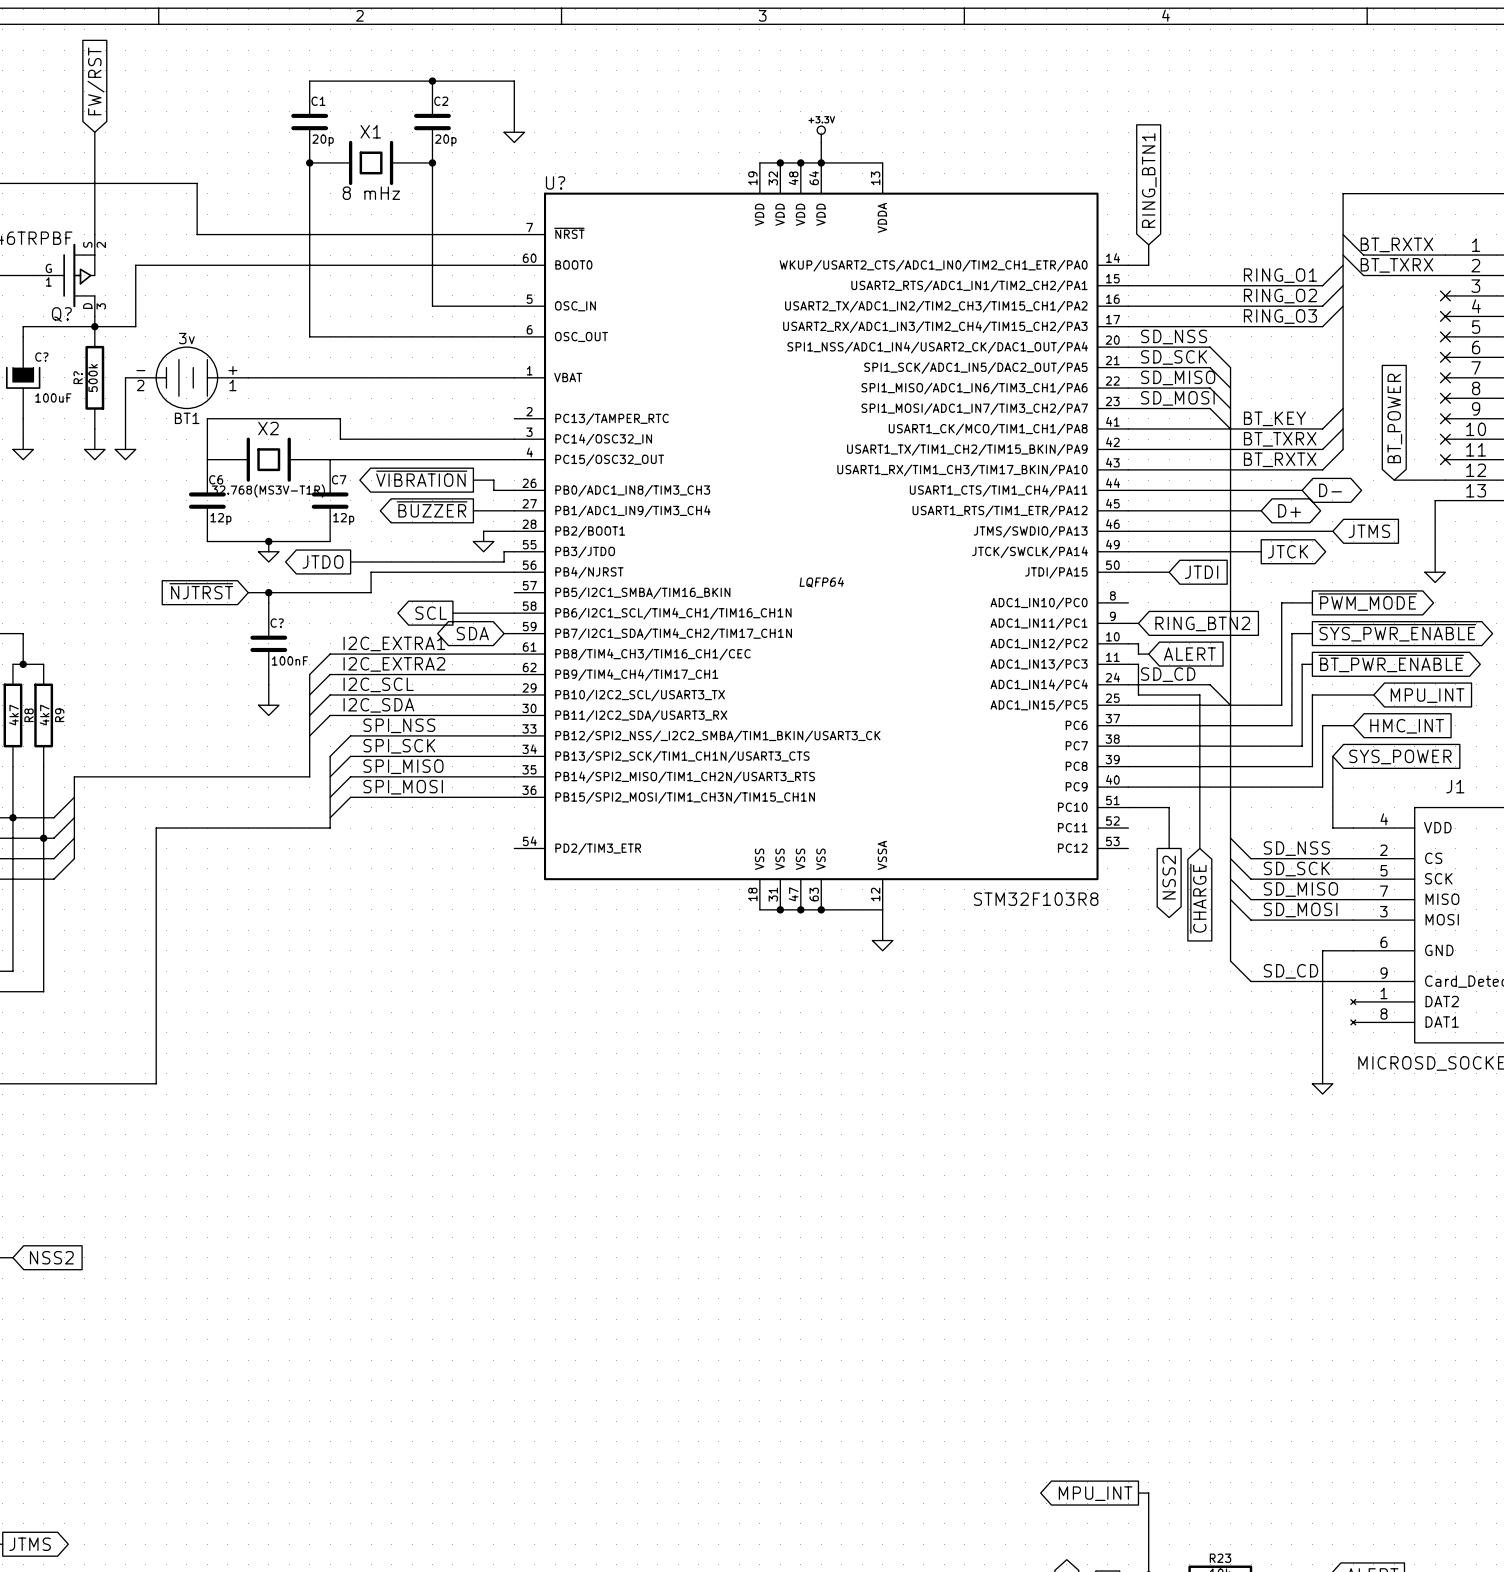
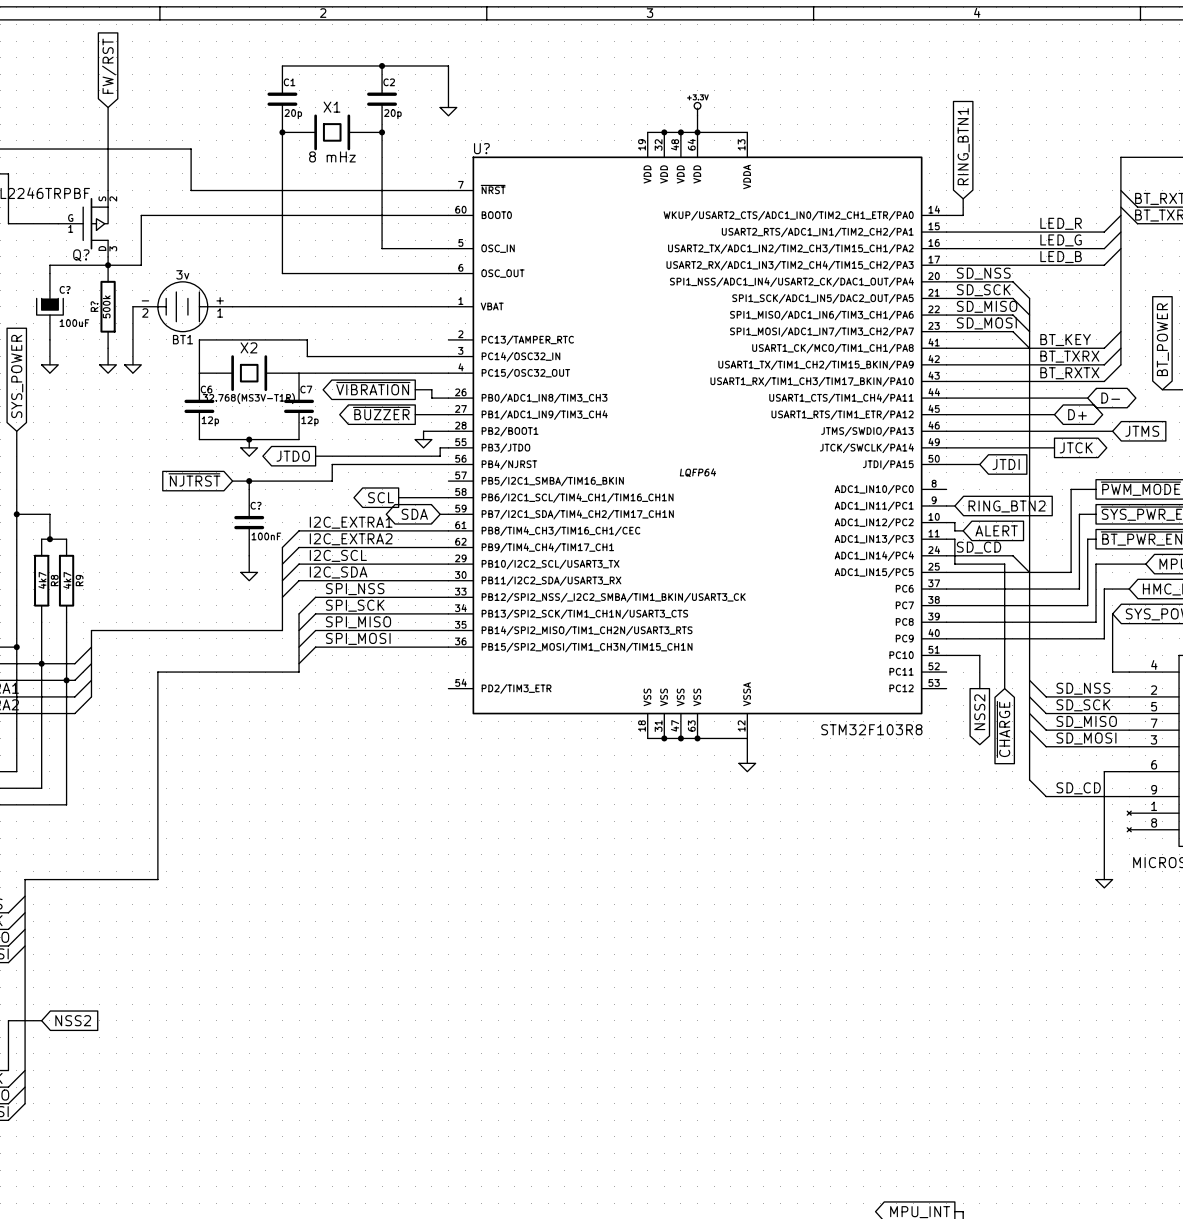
label: RING_O1 (1280, 275) -> LED_R (1061, 223)
label: RING_O2 (1280, 296) -> LED_G (1061, 240)
label: RING_O3 (1280, 316) -> LED_B (1061, 257)

